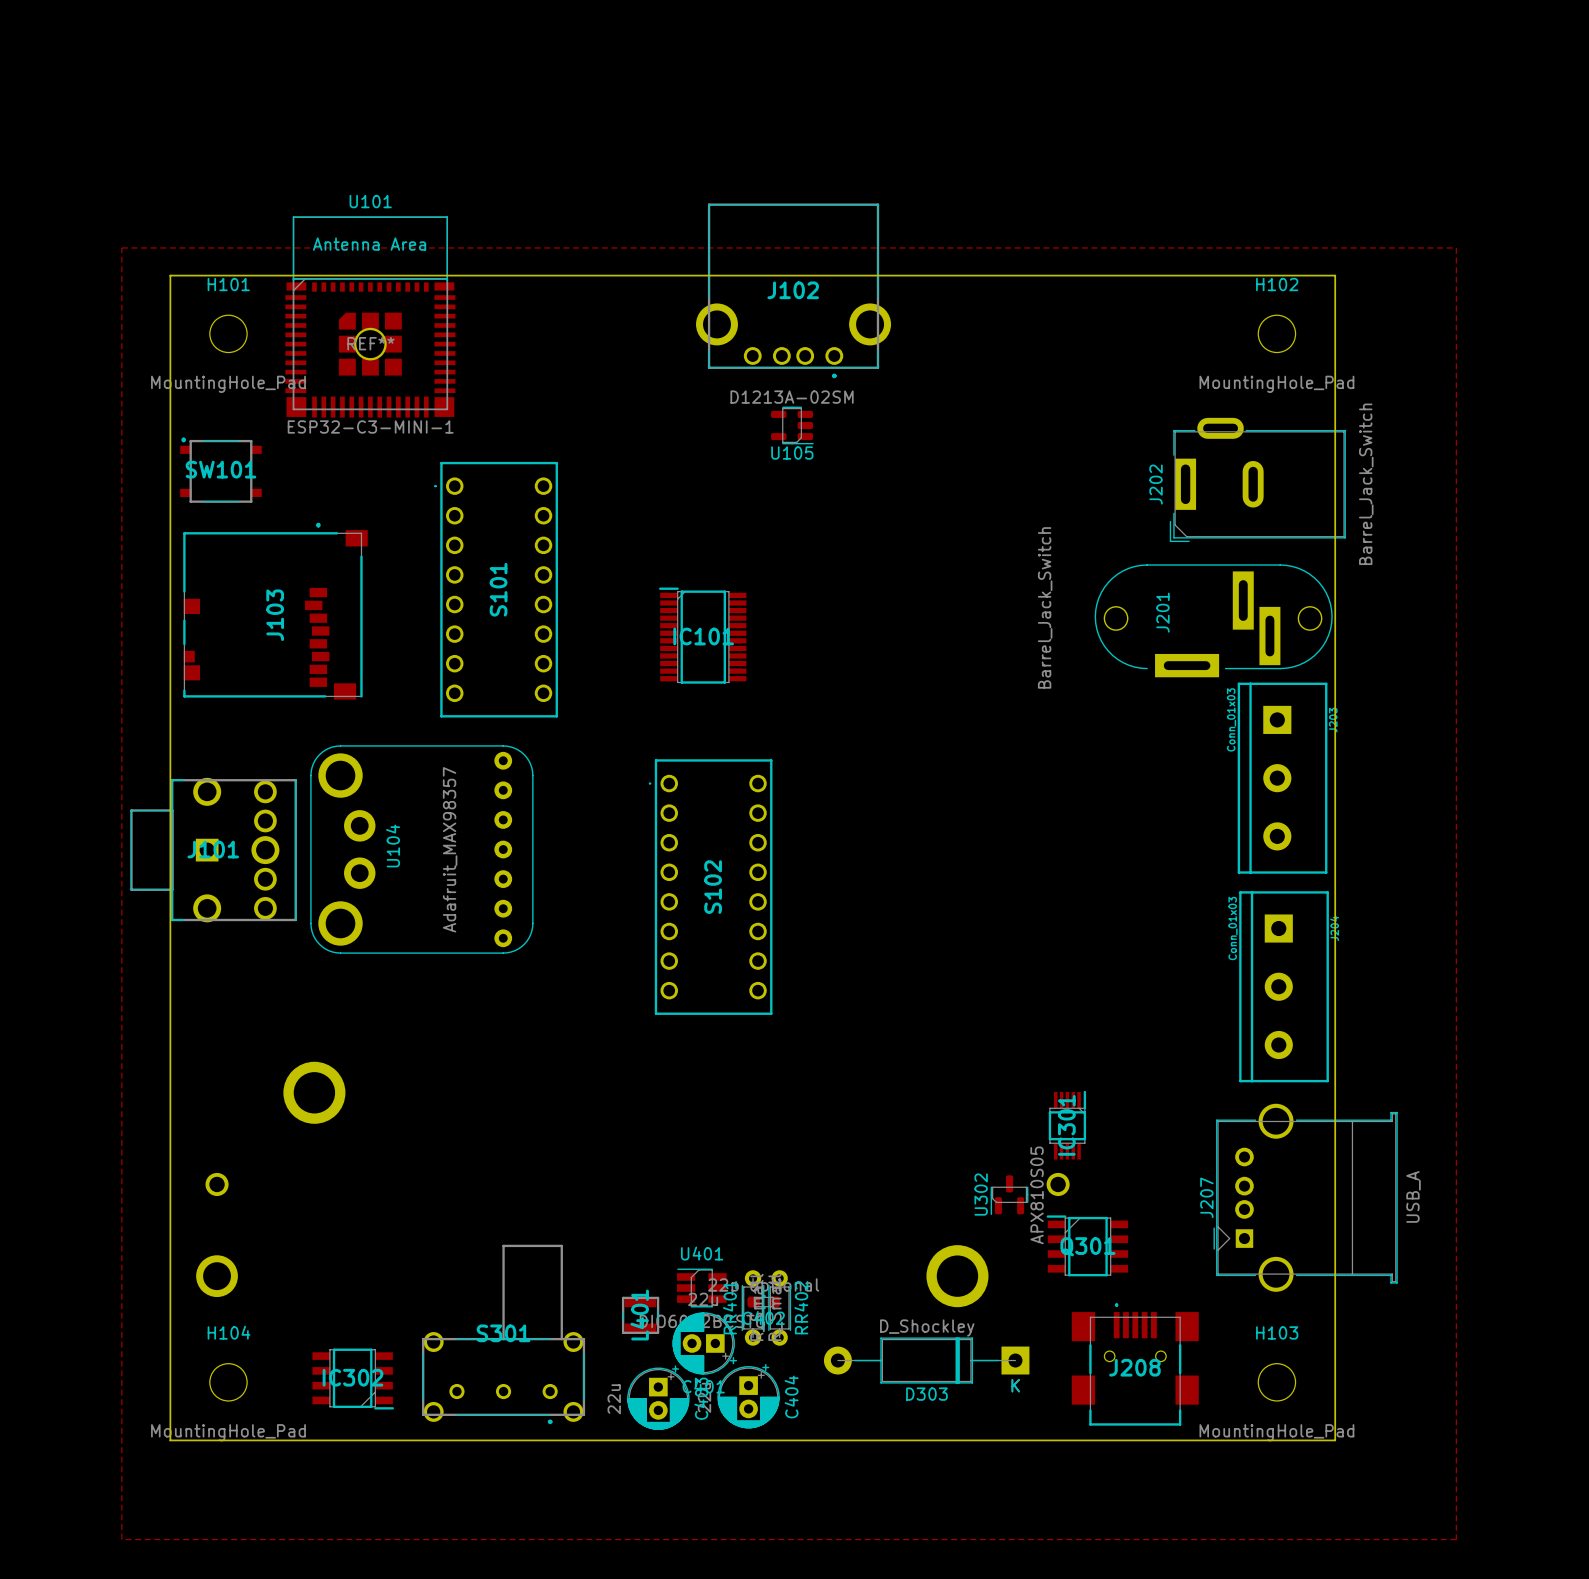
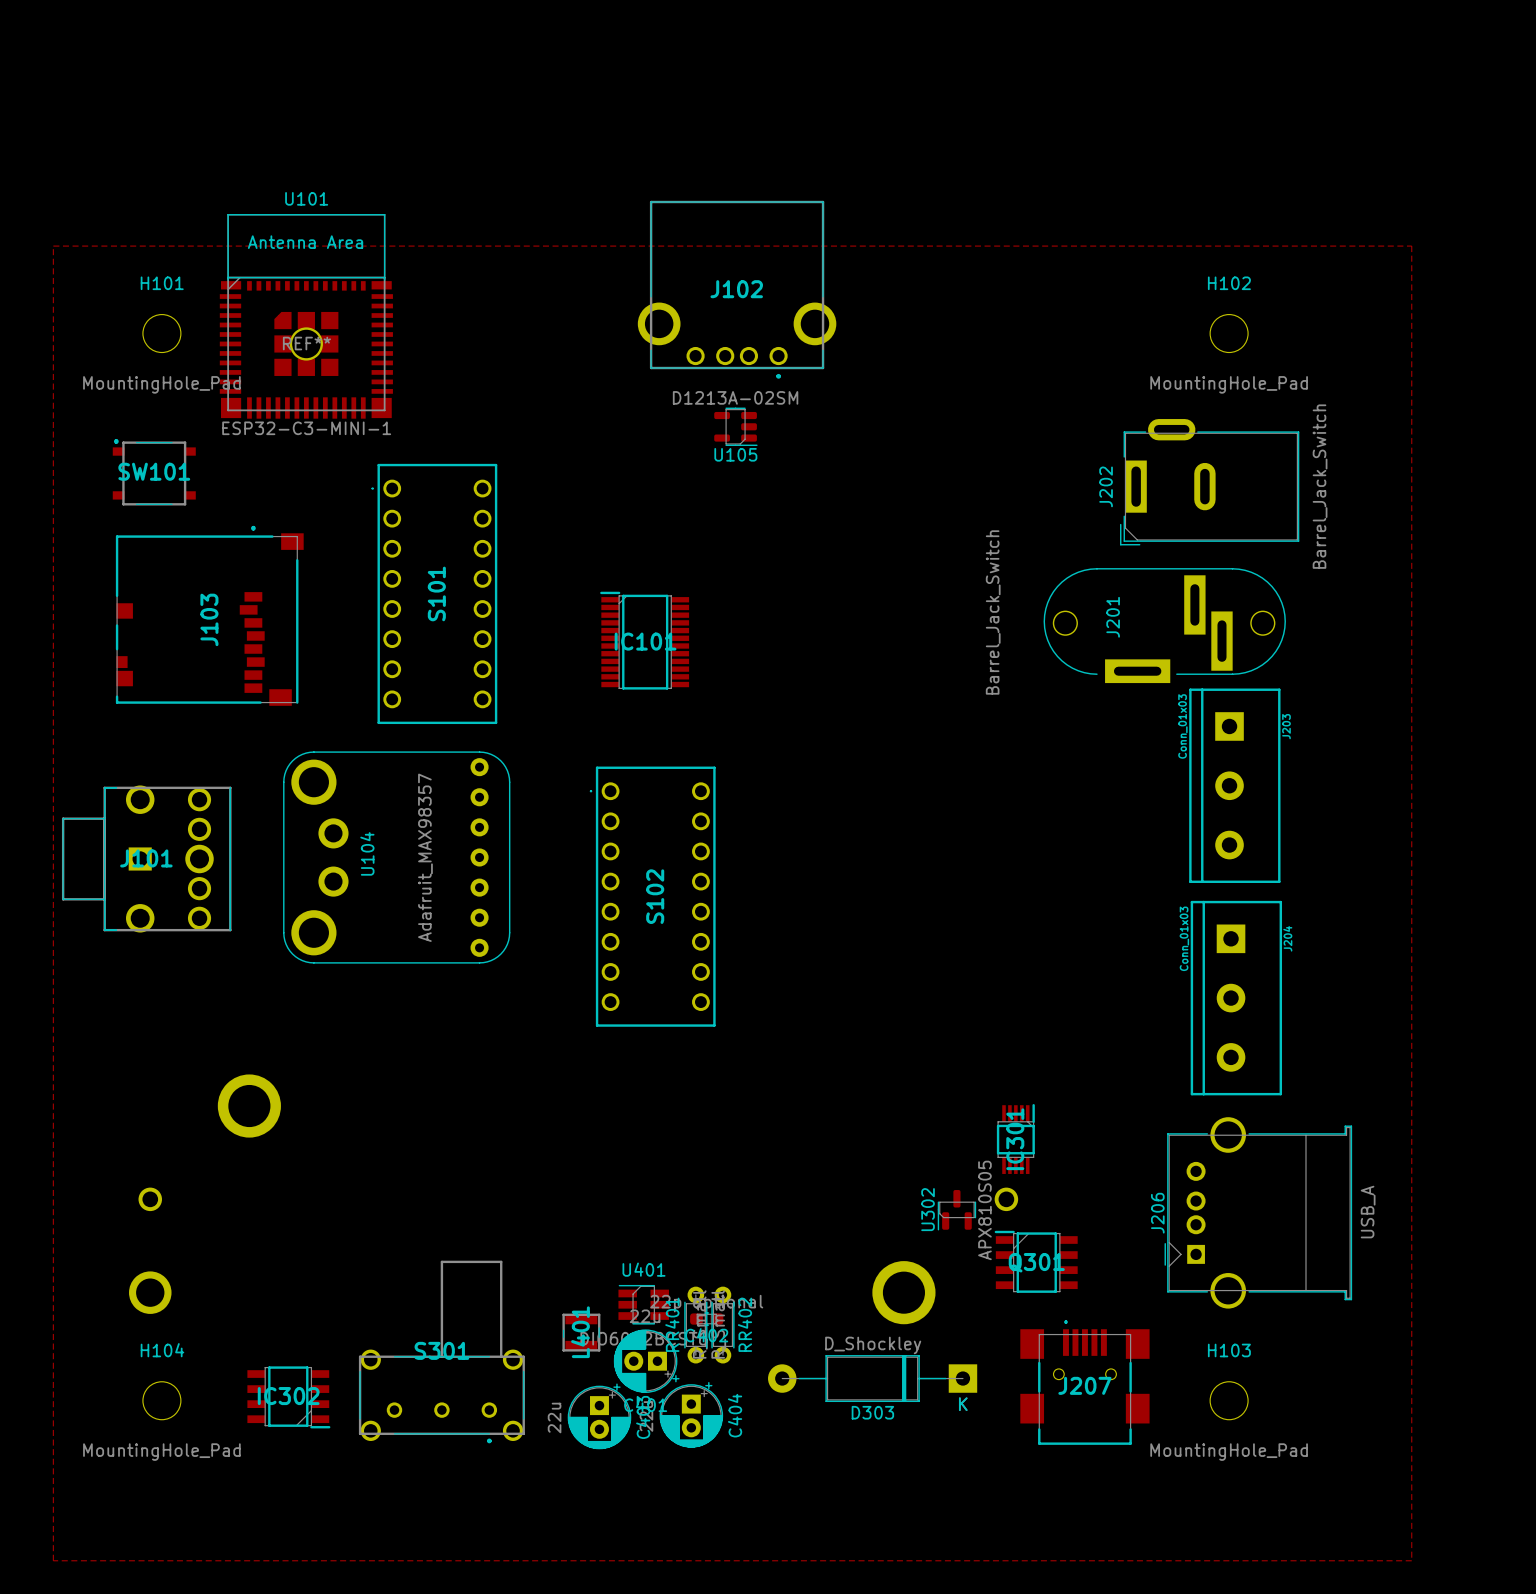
board edge: (170, 275) (1335, 275) (1335, 1440) (170, 1440) (170, 275) -> none
U104 footprint: [310, 745, 534, 954] -> [283, 751, 511, 964]
J207 name: J207 (1206, 1197) -> J206 (1157, 1213)
J208 name: J208 (1134, 1367) -> J207 (1084, 1385)

